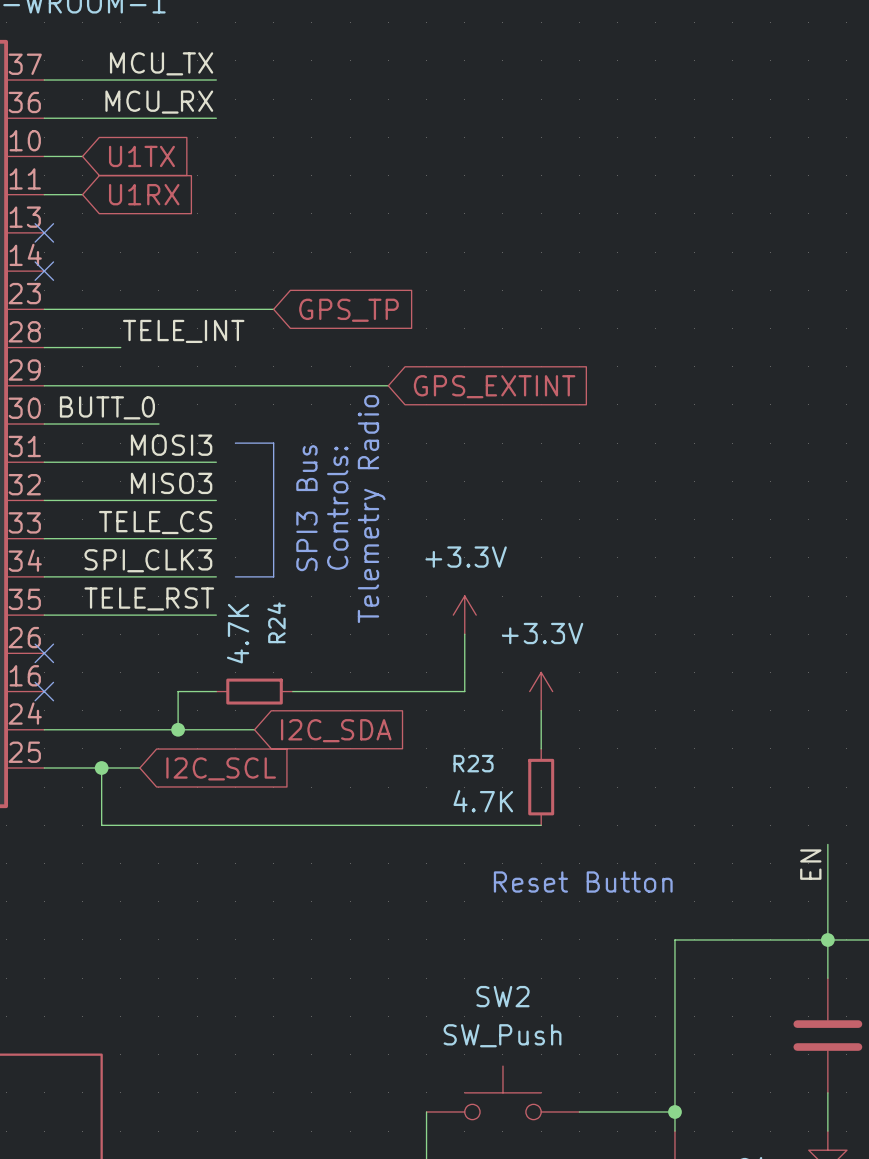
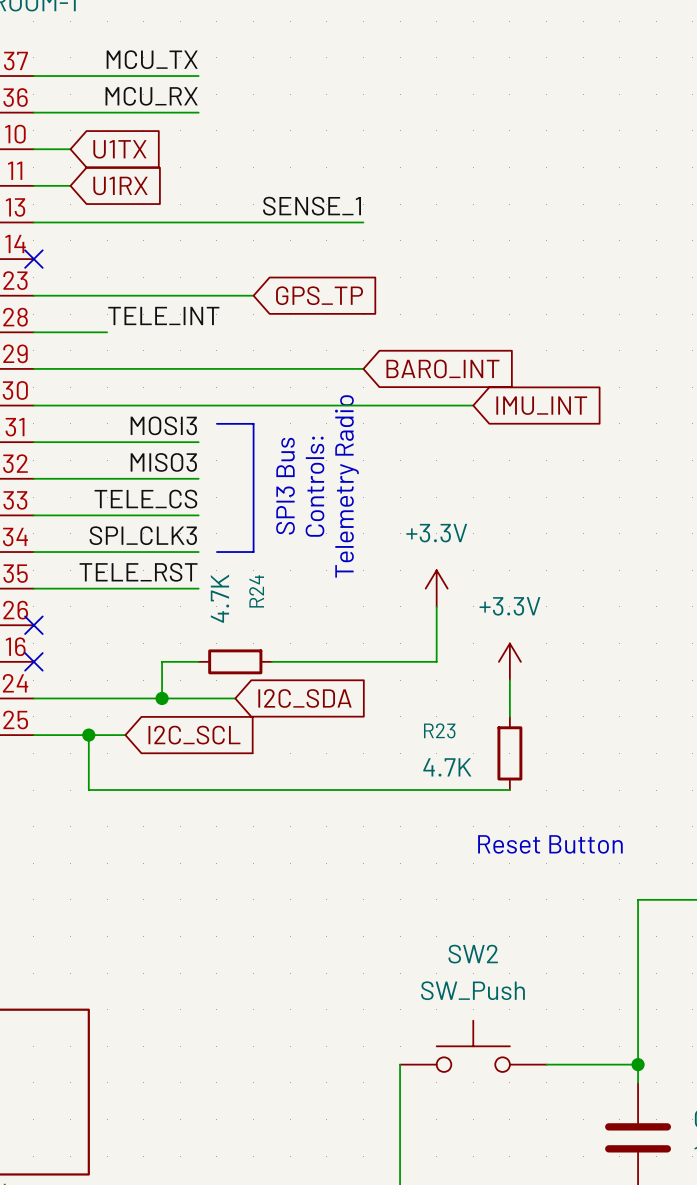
label: none -> SENSE_1 (312, 206)
wire: none -> (33, 222) (363, 222)
no-connect mark: (44, 232) -> none
global label: GPS_EXTINT (494, 386) -> BARO_INT (442, 368)
label: BUTT_0 (107, 407) -> none
wire: none -> (143, 405) (473, 405)
global label: none -> IMU_INT (541, 405)

